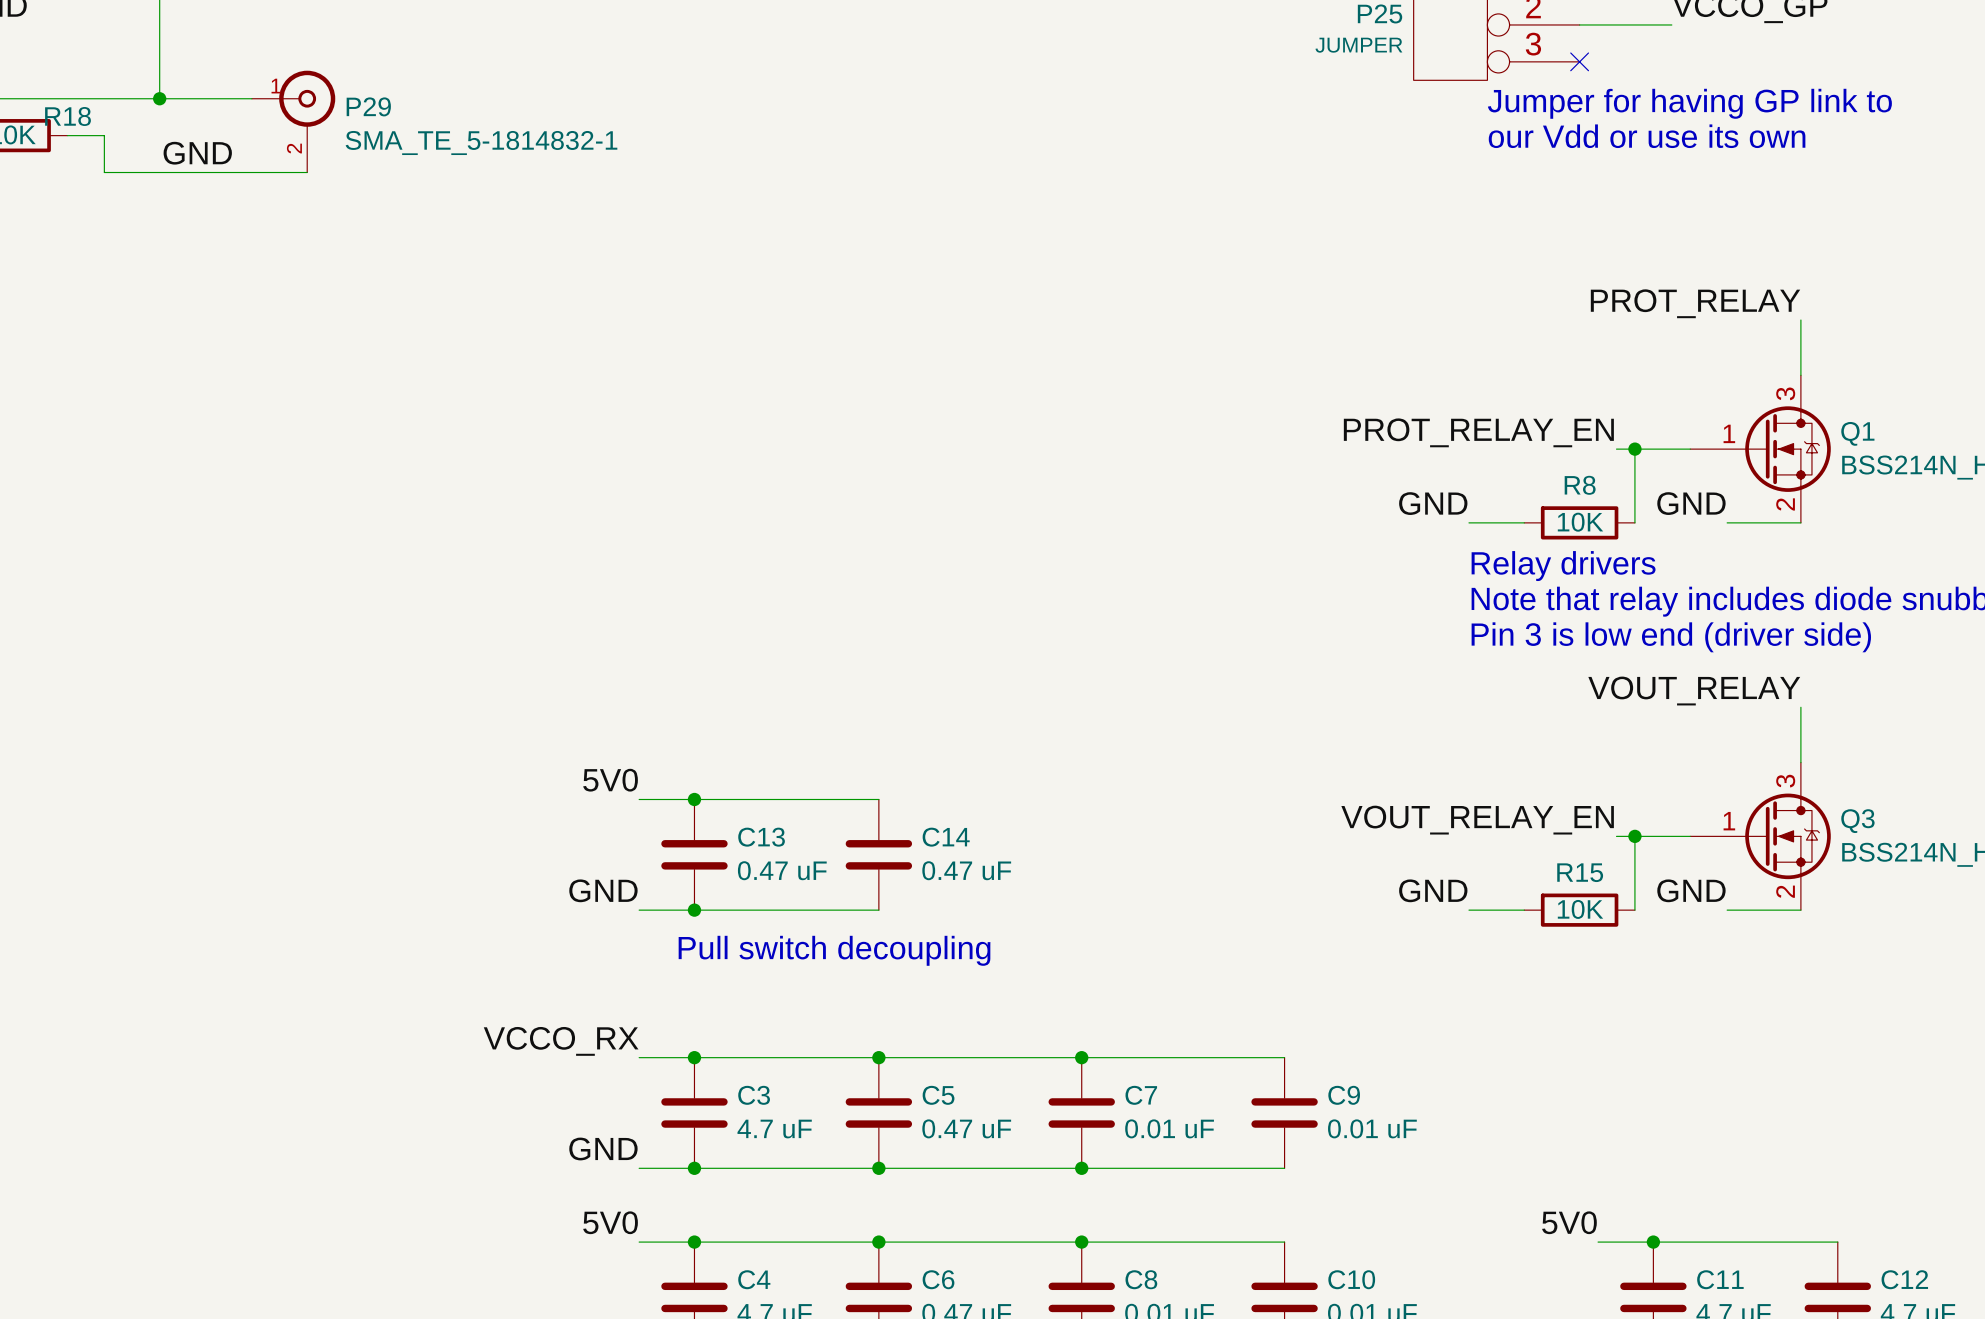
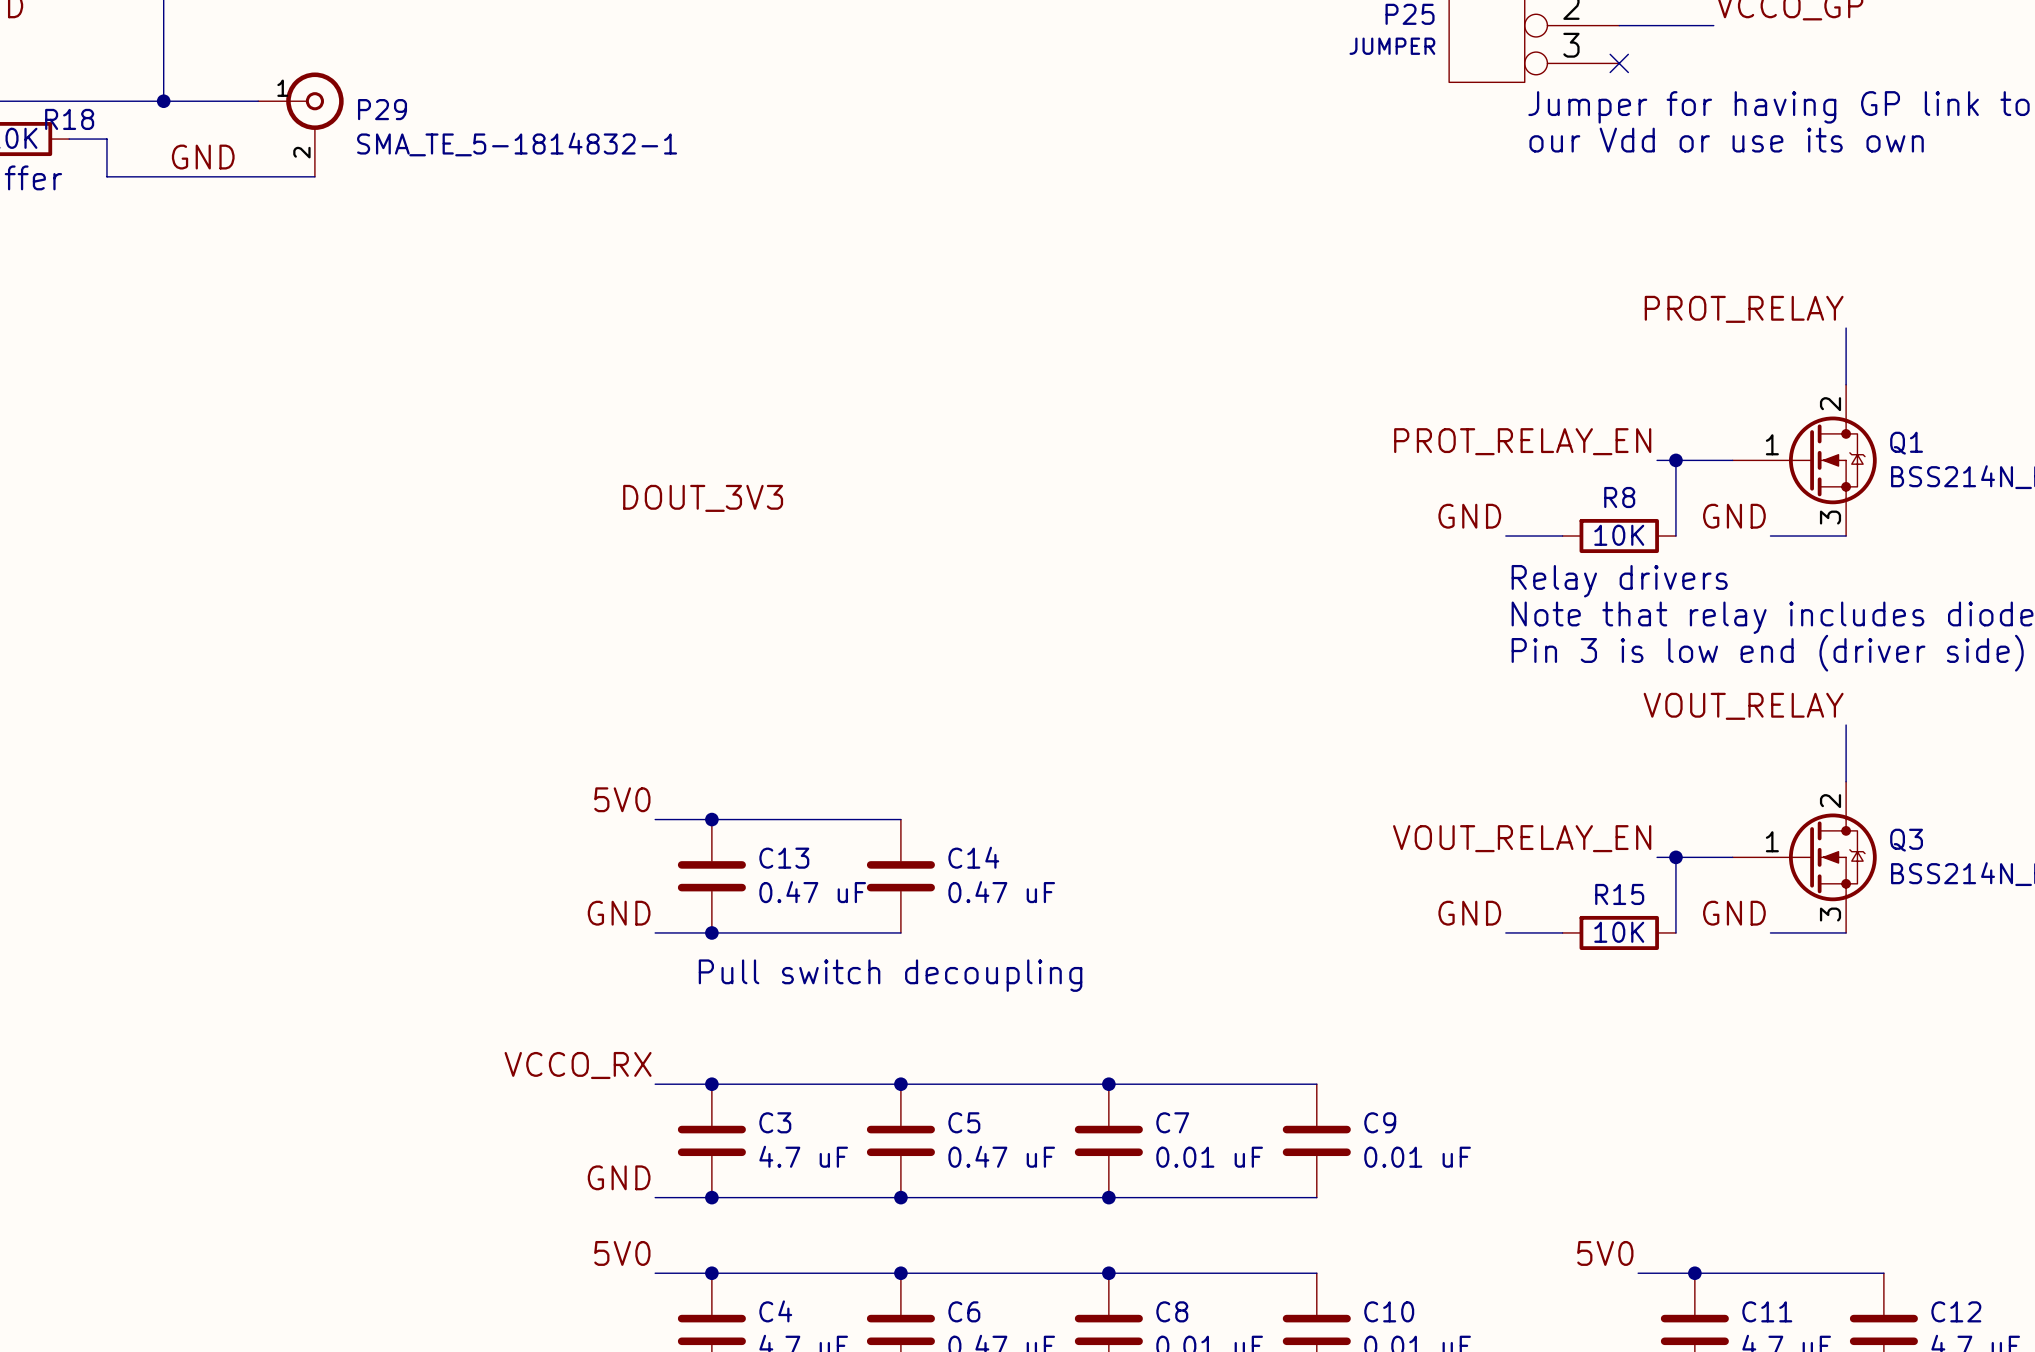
Q1 pin number: 3 (1785, 393) -> 2 (1830, 404)
label: none -> DOUT_3V3 (703, 498)
Q1 pin number: 2 (1785, 504) -> 3 (1830, 517)
Q3 pin number: 3 (1785, 781) -> 2 (1830, 801)
Q3 pin number: 2 (1785, 891) -> 3 (1830, 914)

